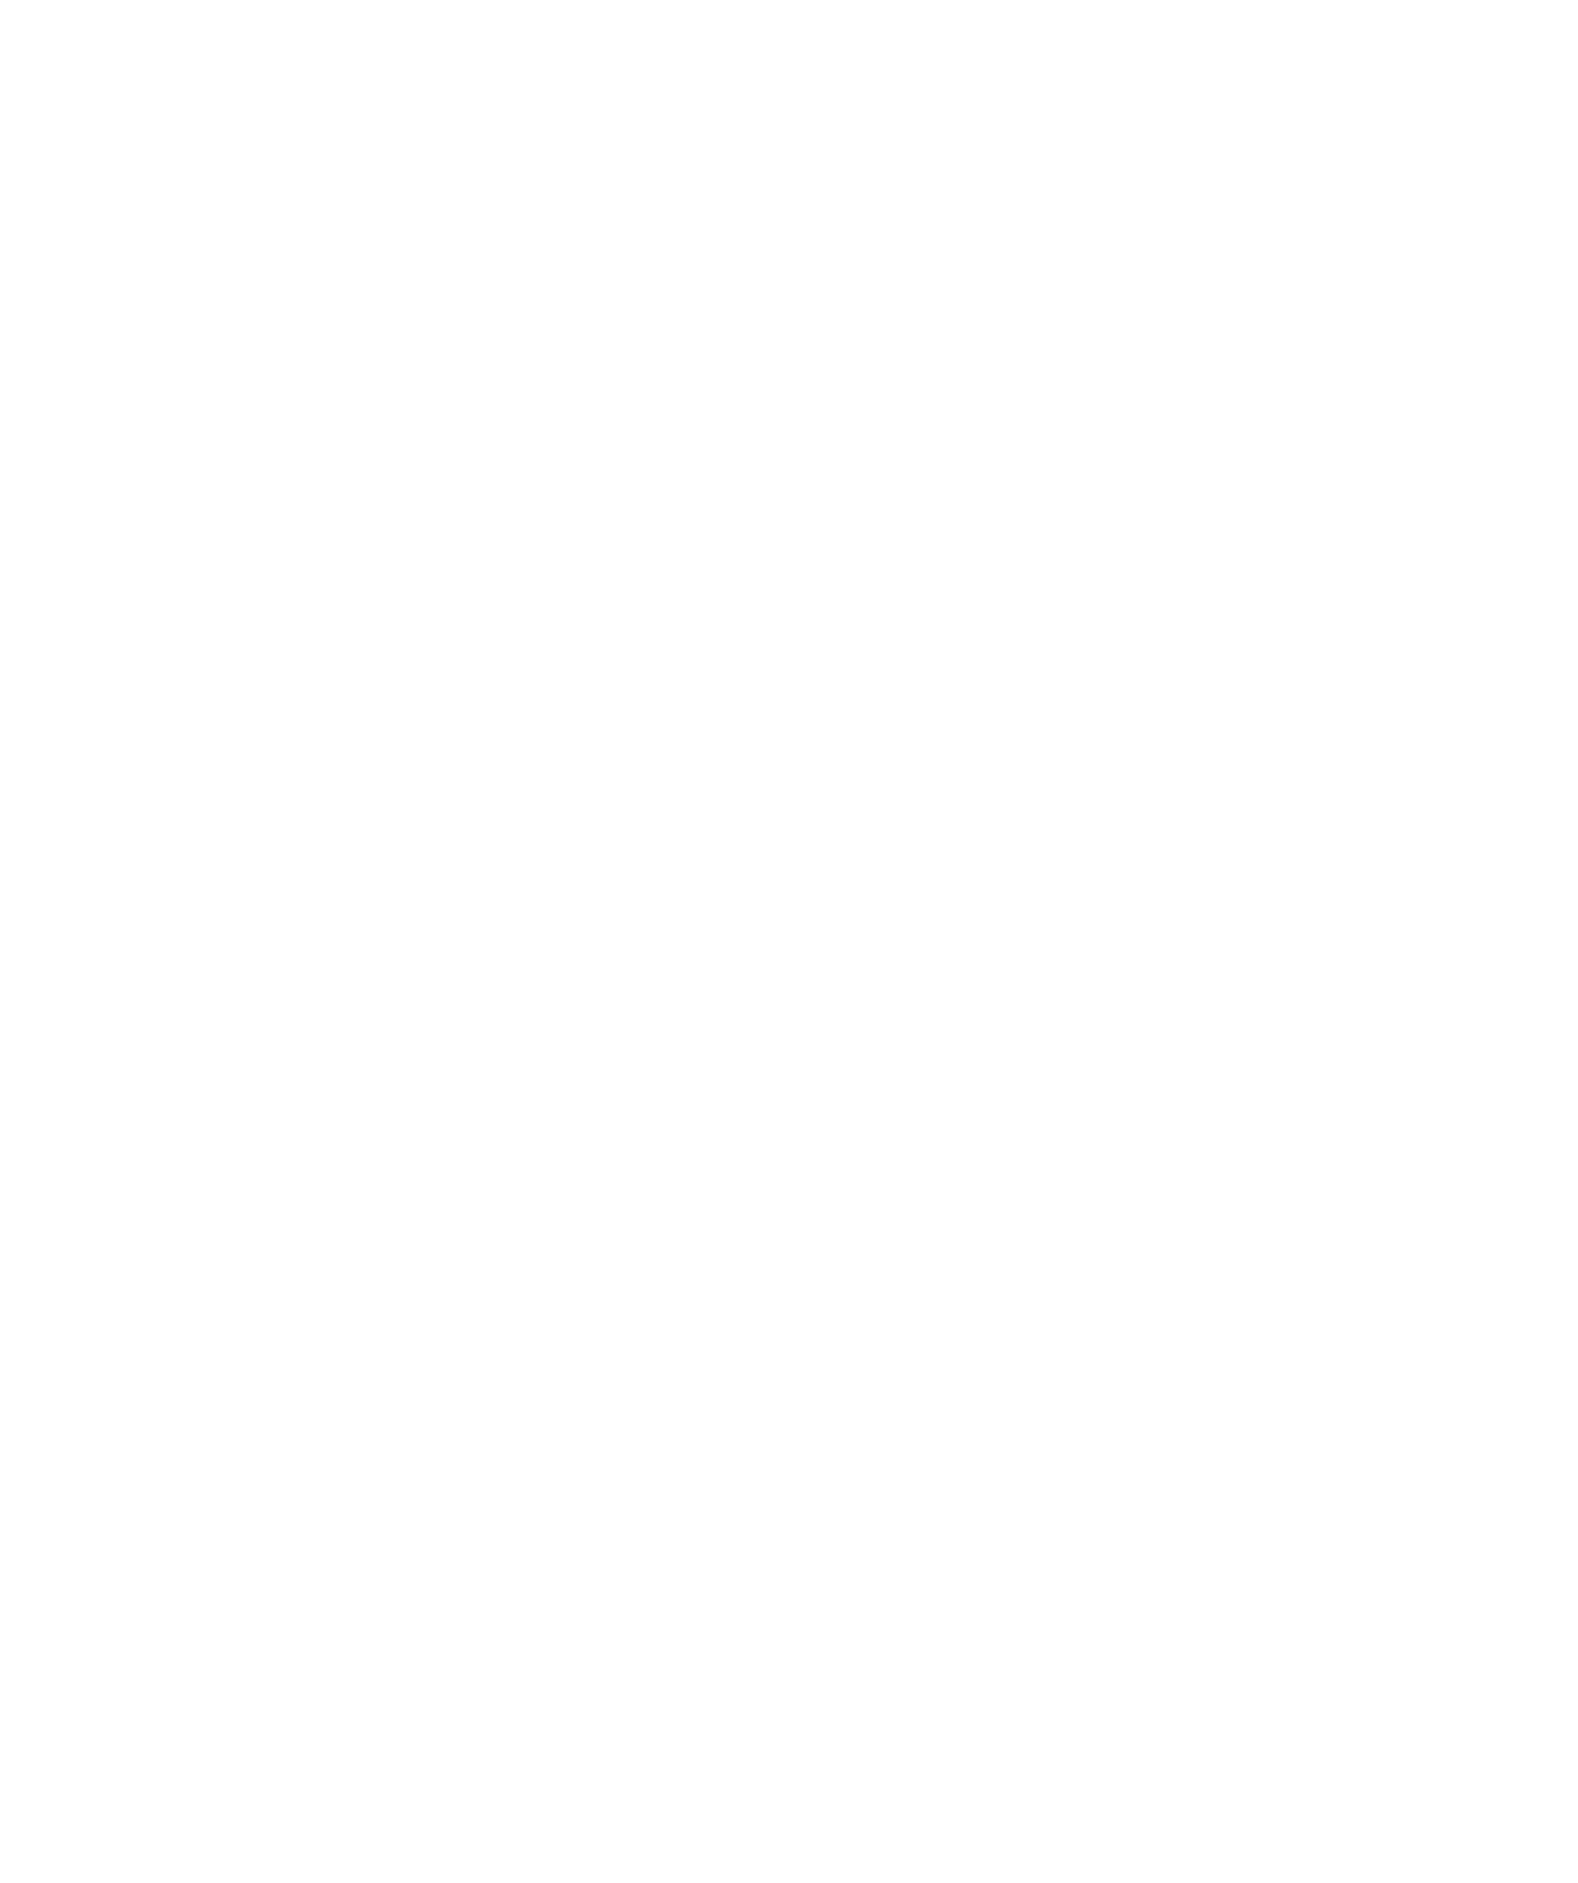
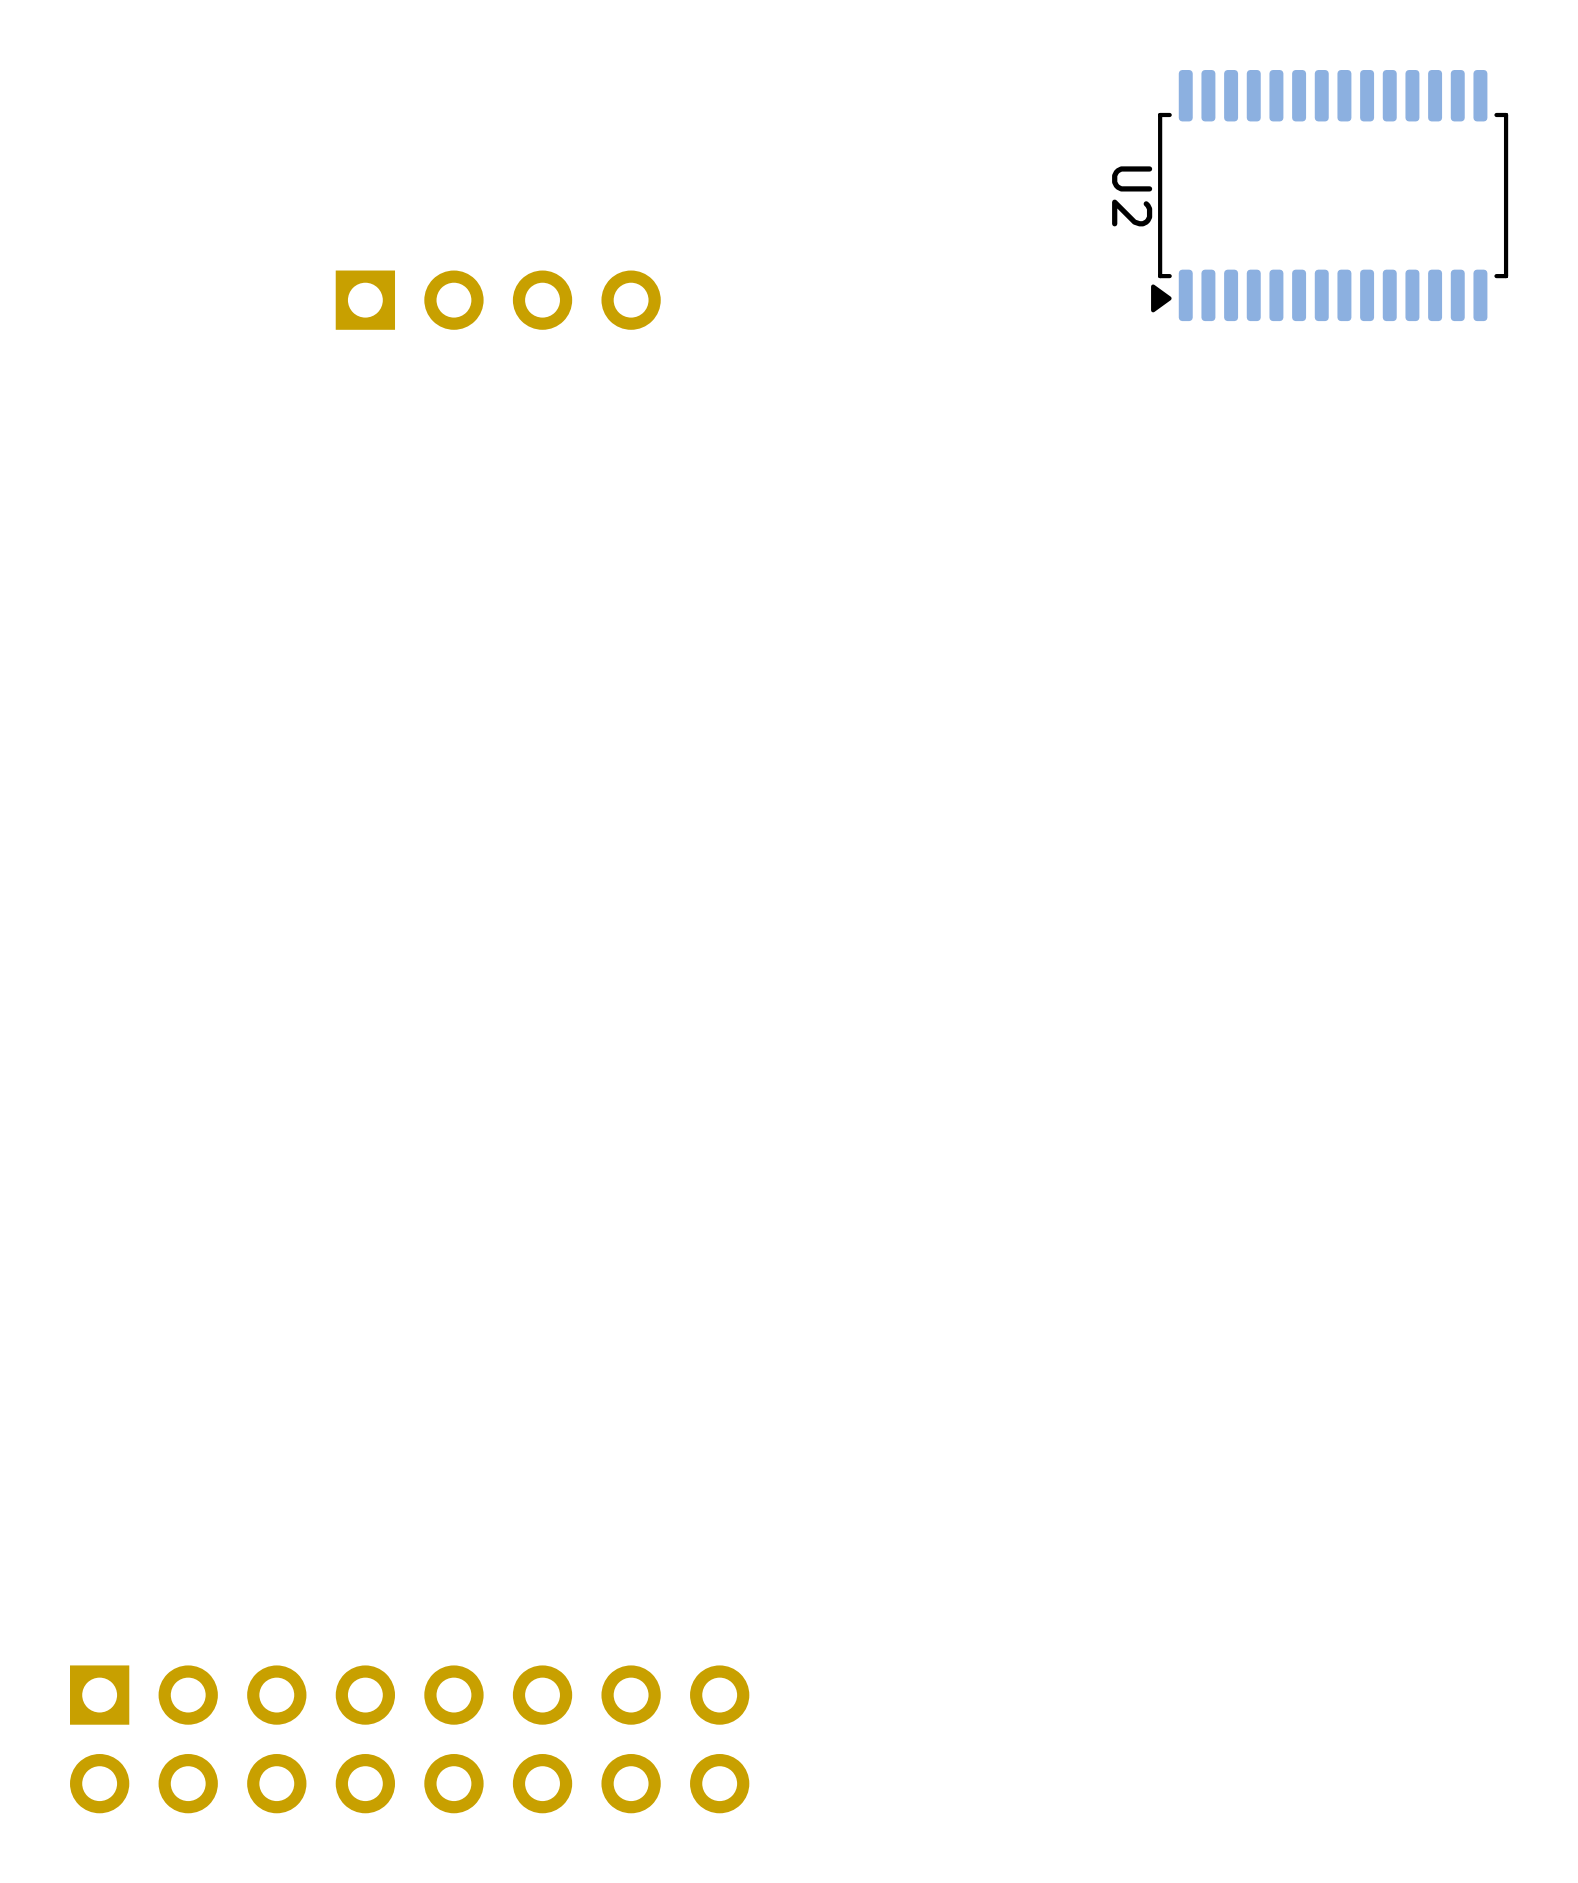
U2: none -> (1329, 195)
part: none -> (498, 300)
part: none -> (409, 1739)

